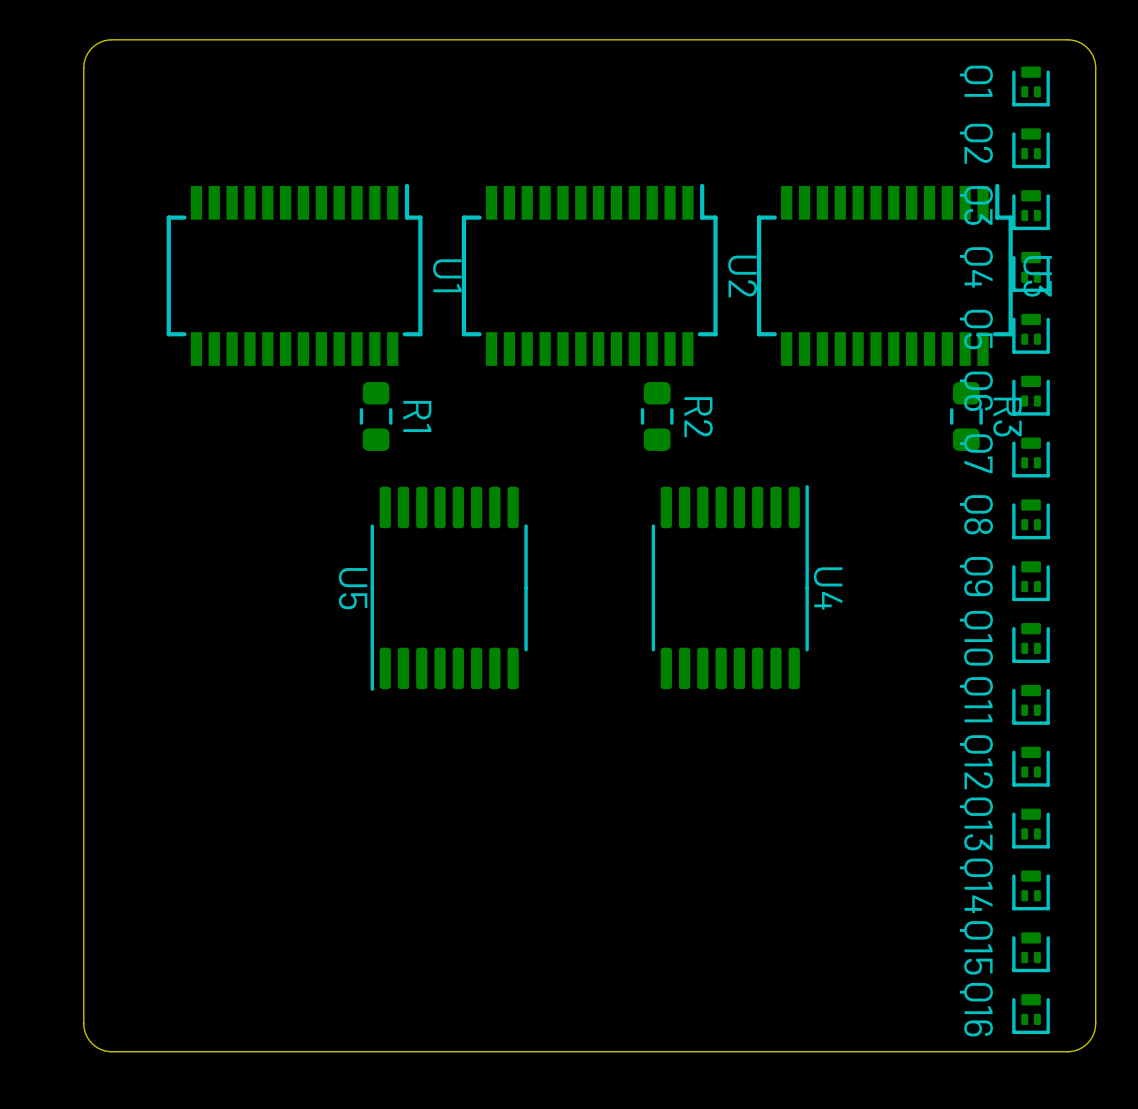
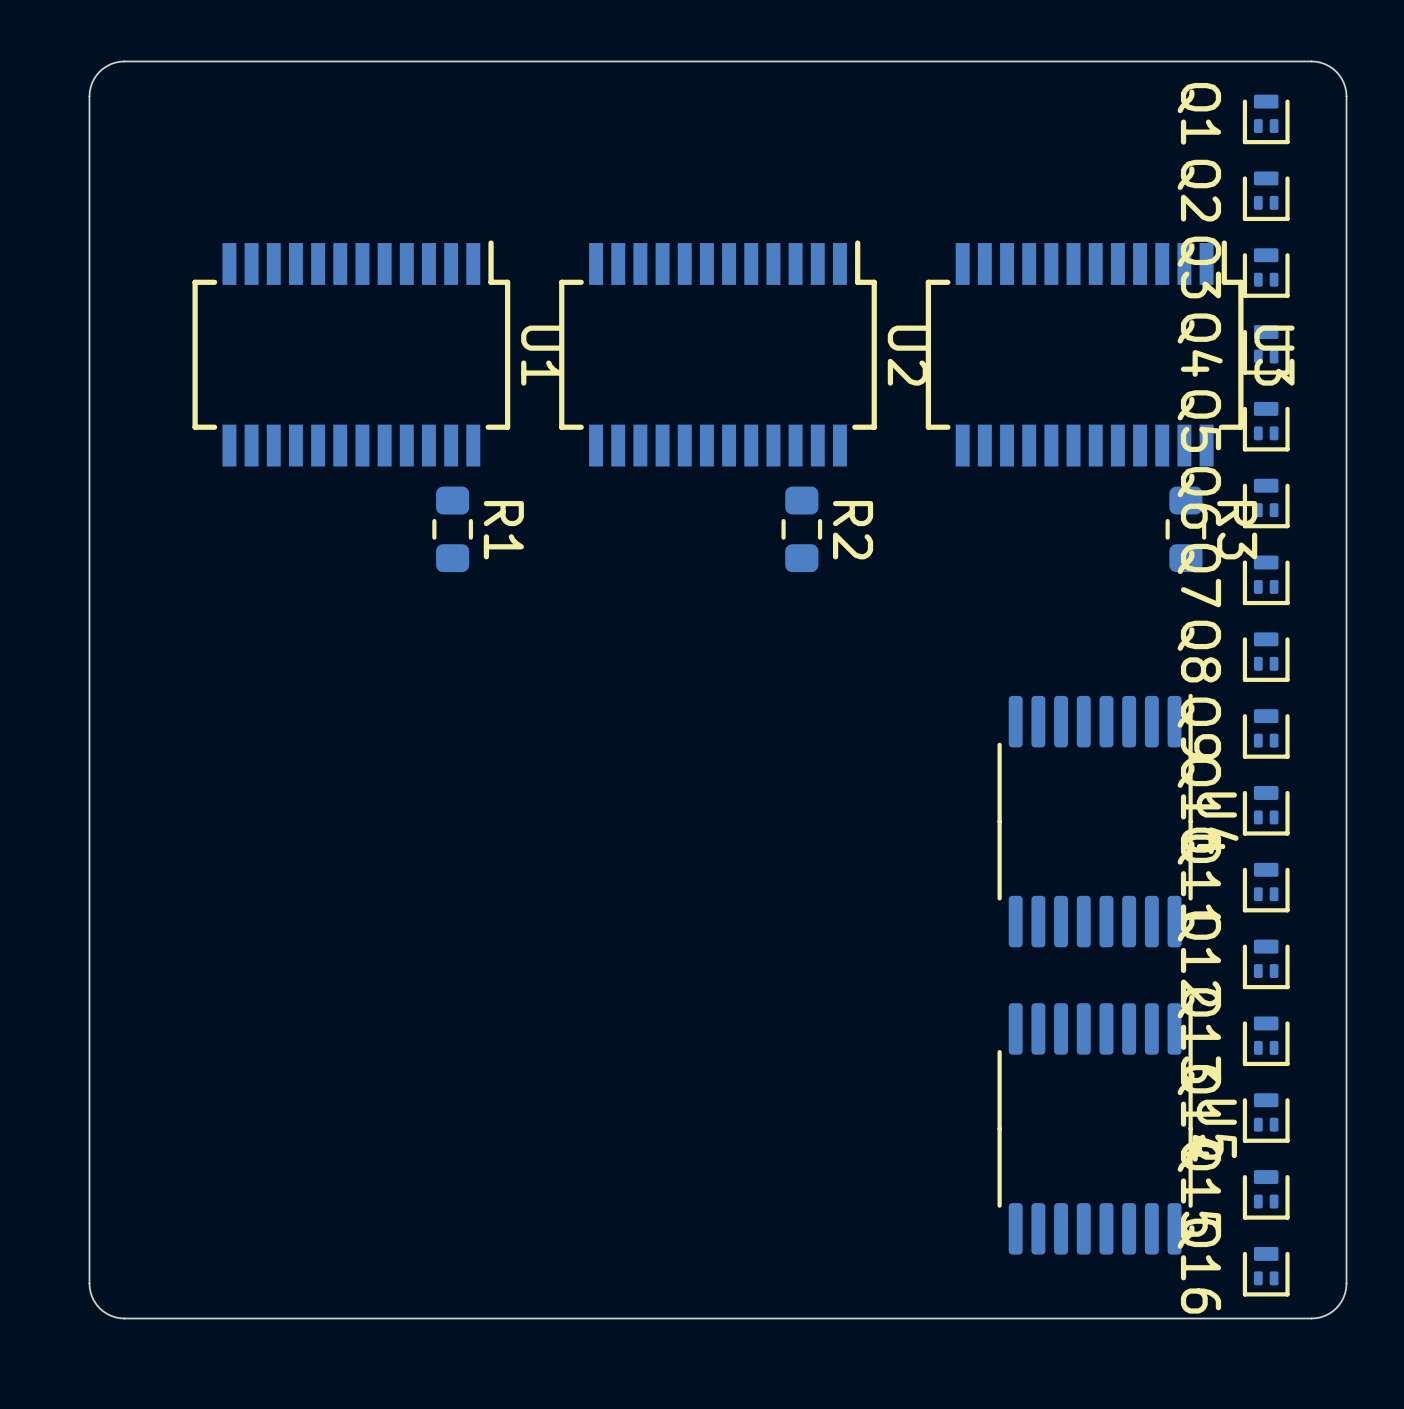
U4 position: (730, 587) -> (1095, 820)
U5 rotation: 0° (449, 588) -> 180° (1095, 1127)
U5 position: (449, 588) -> (1095, 1127)

